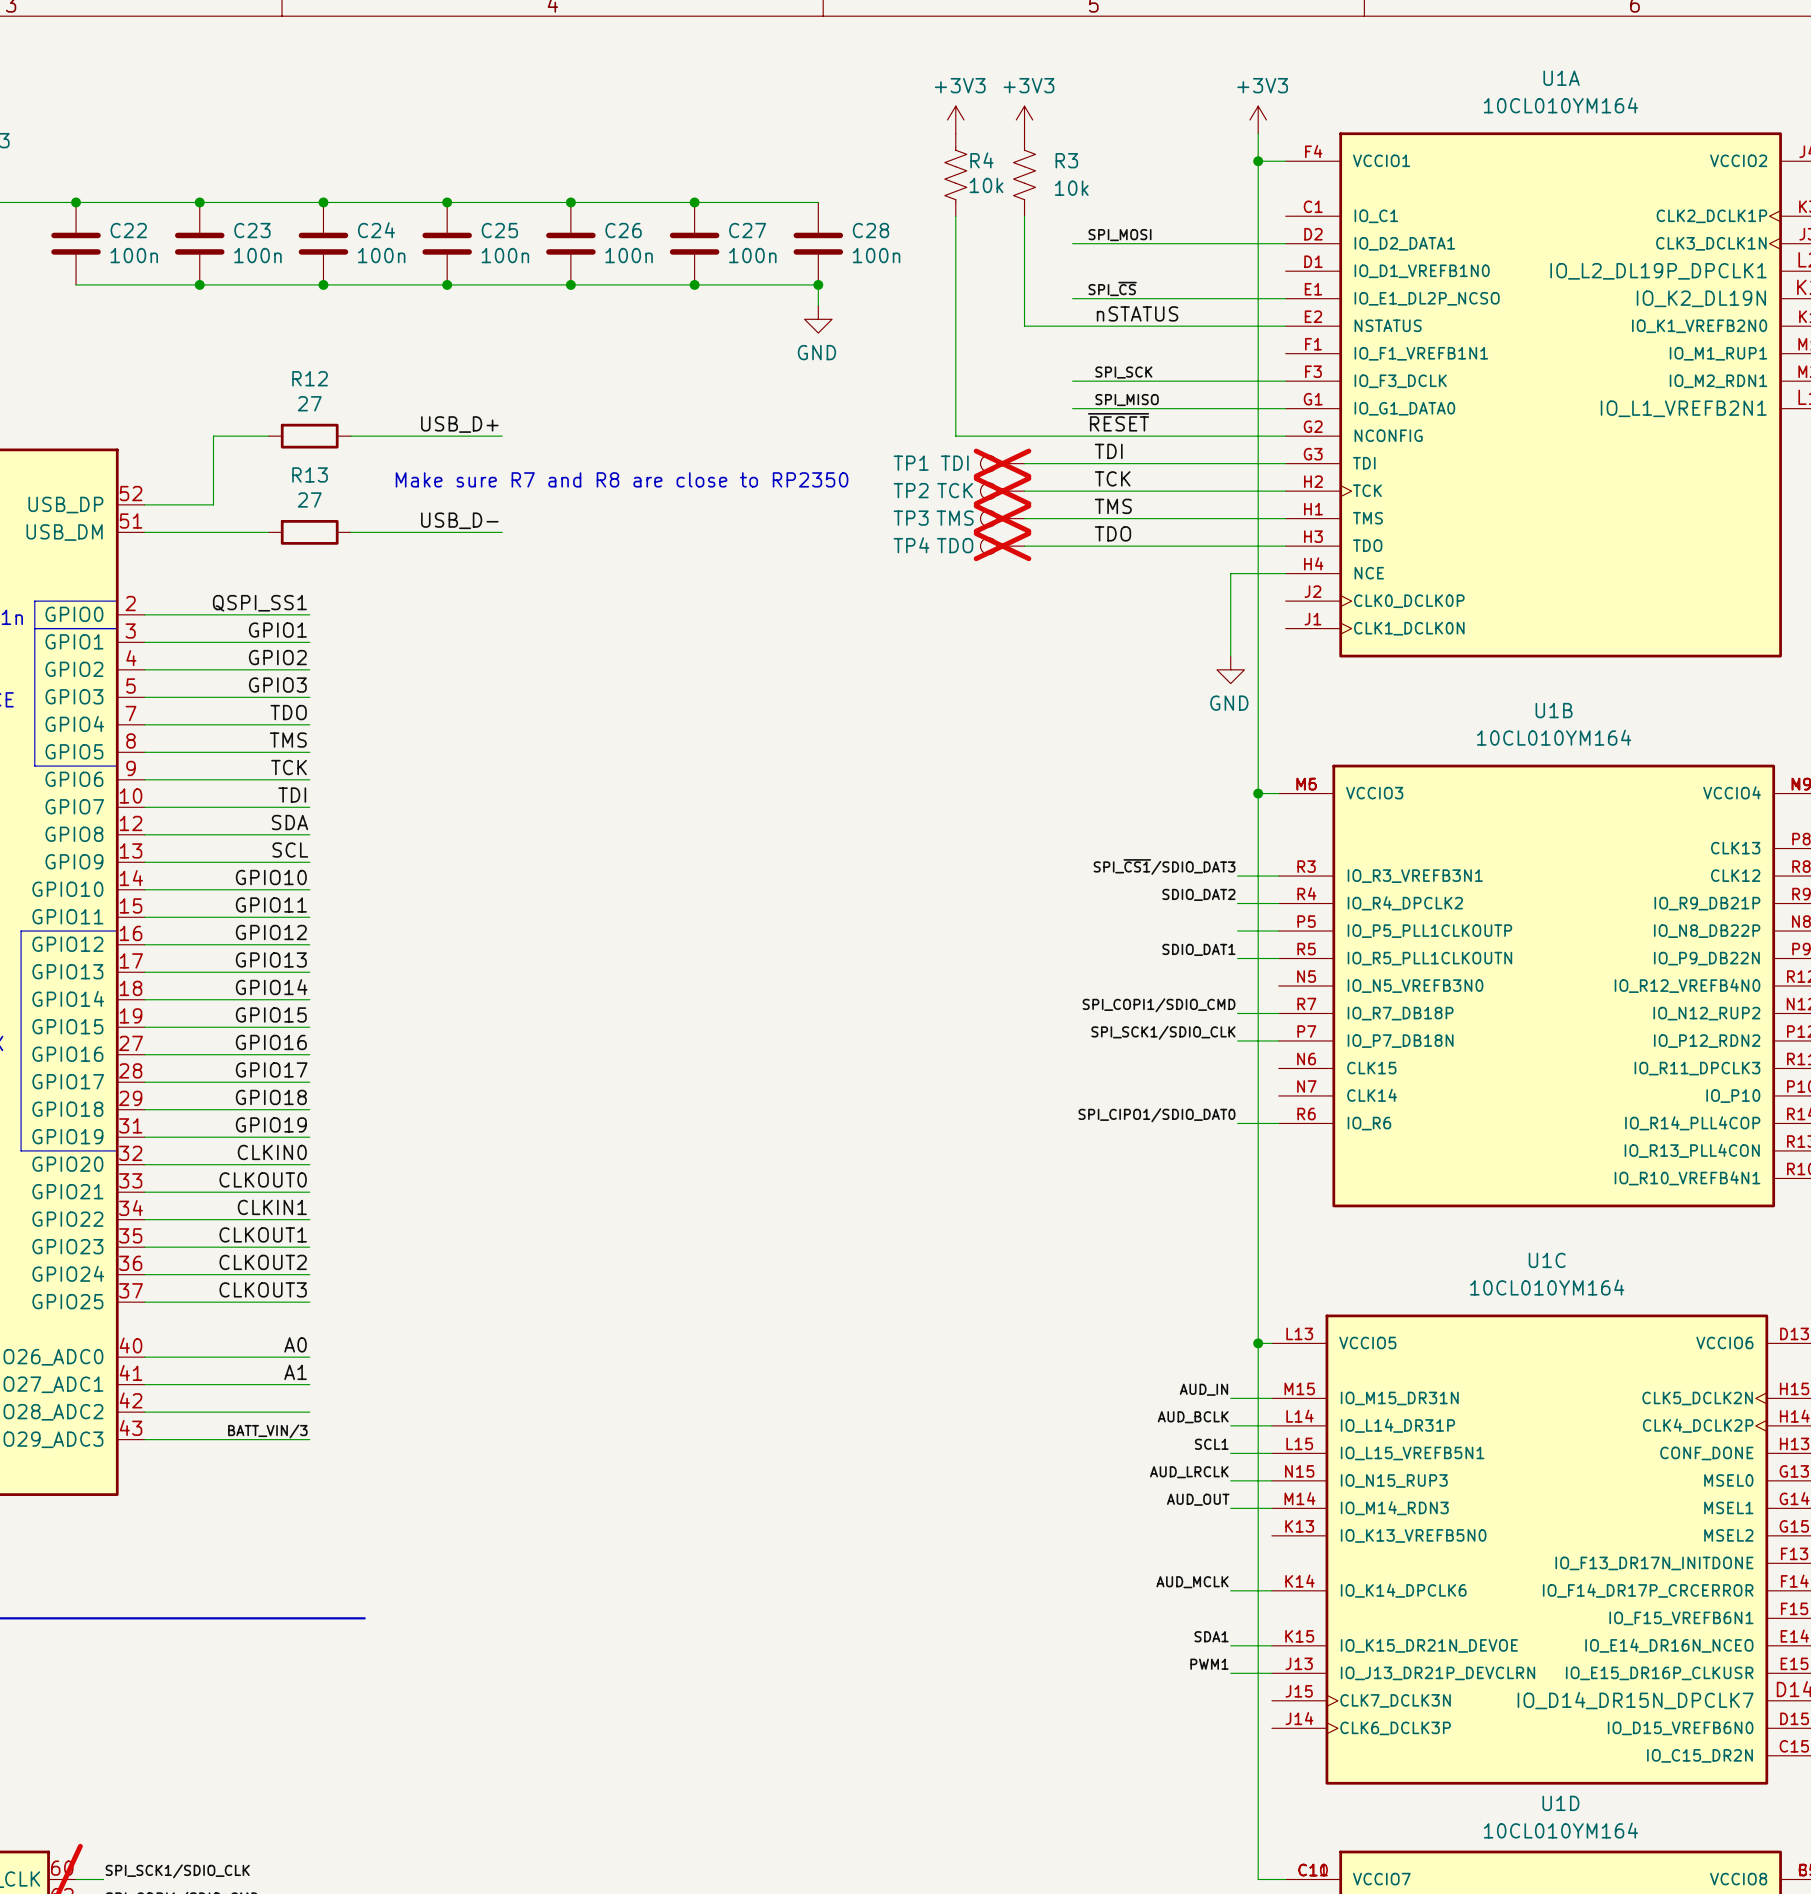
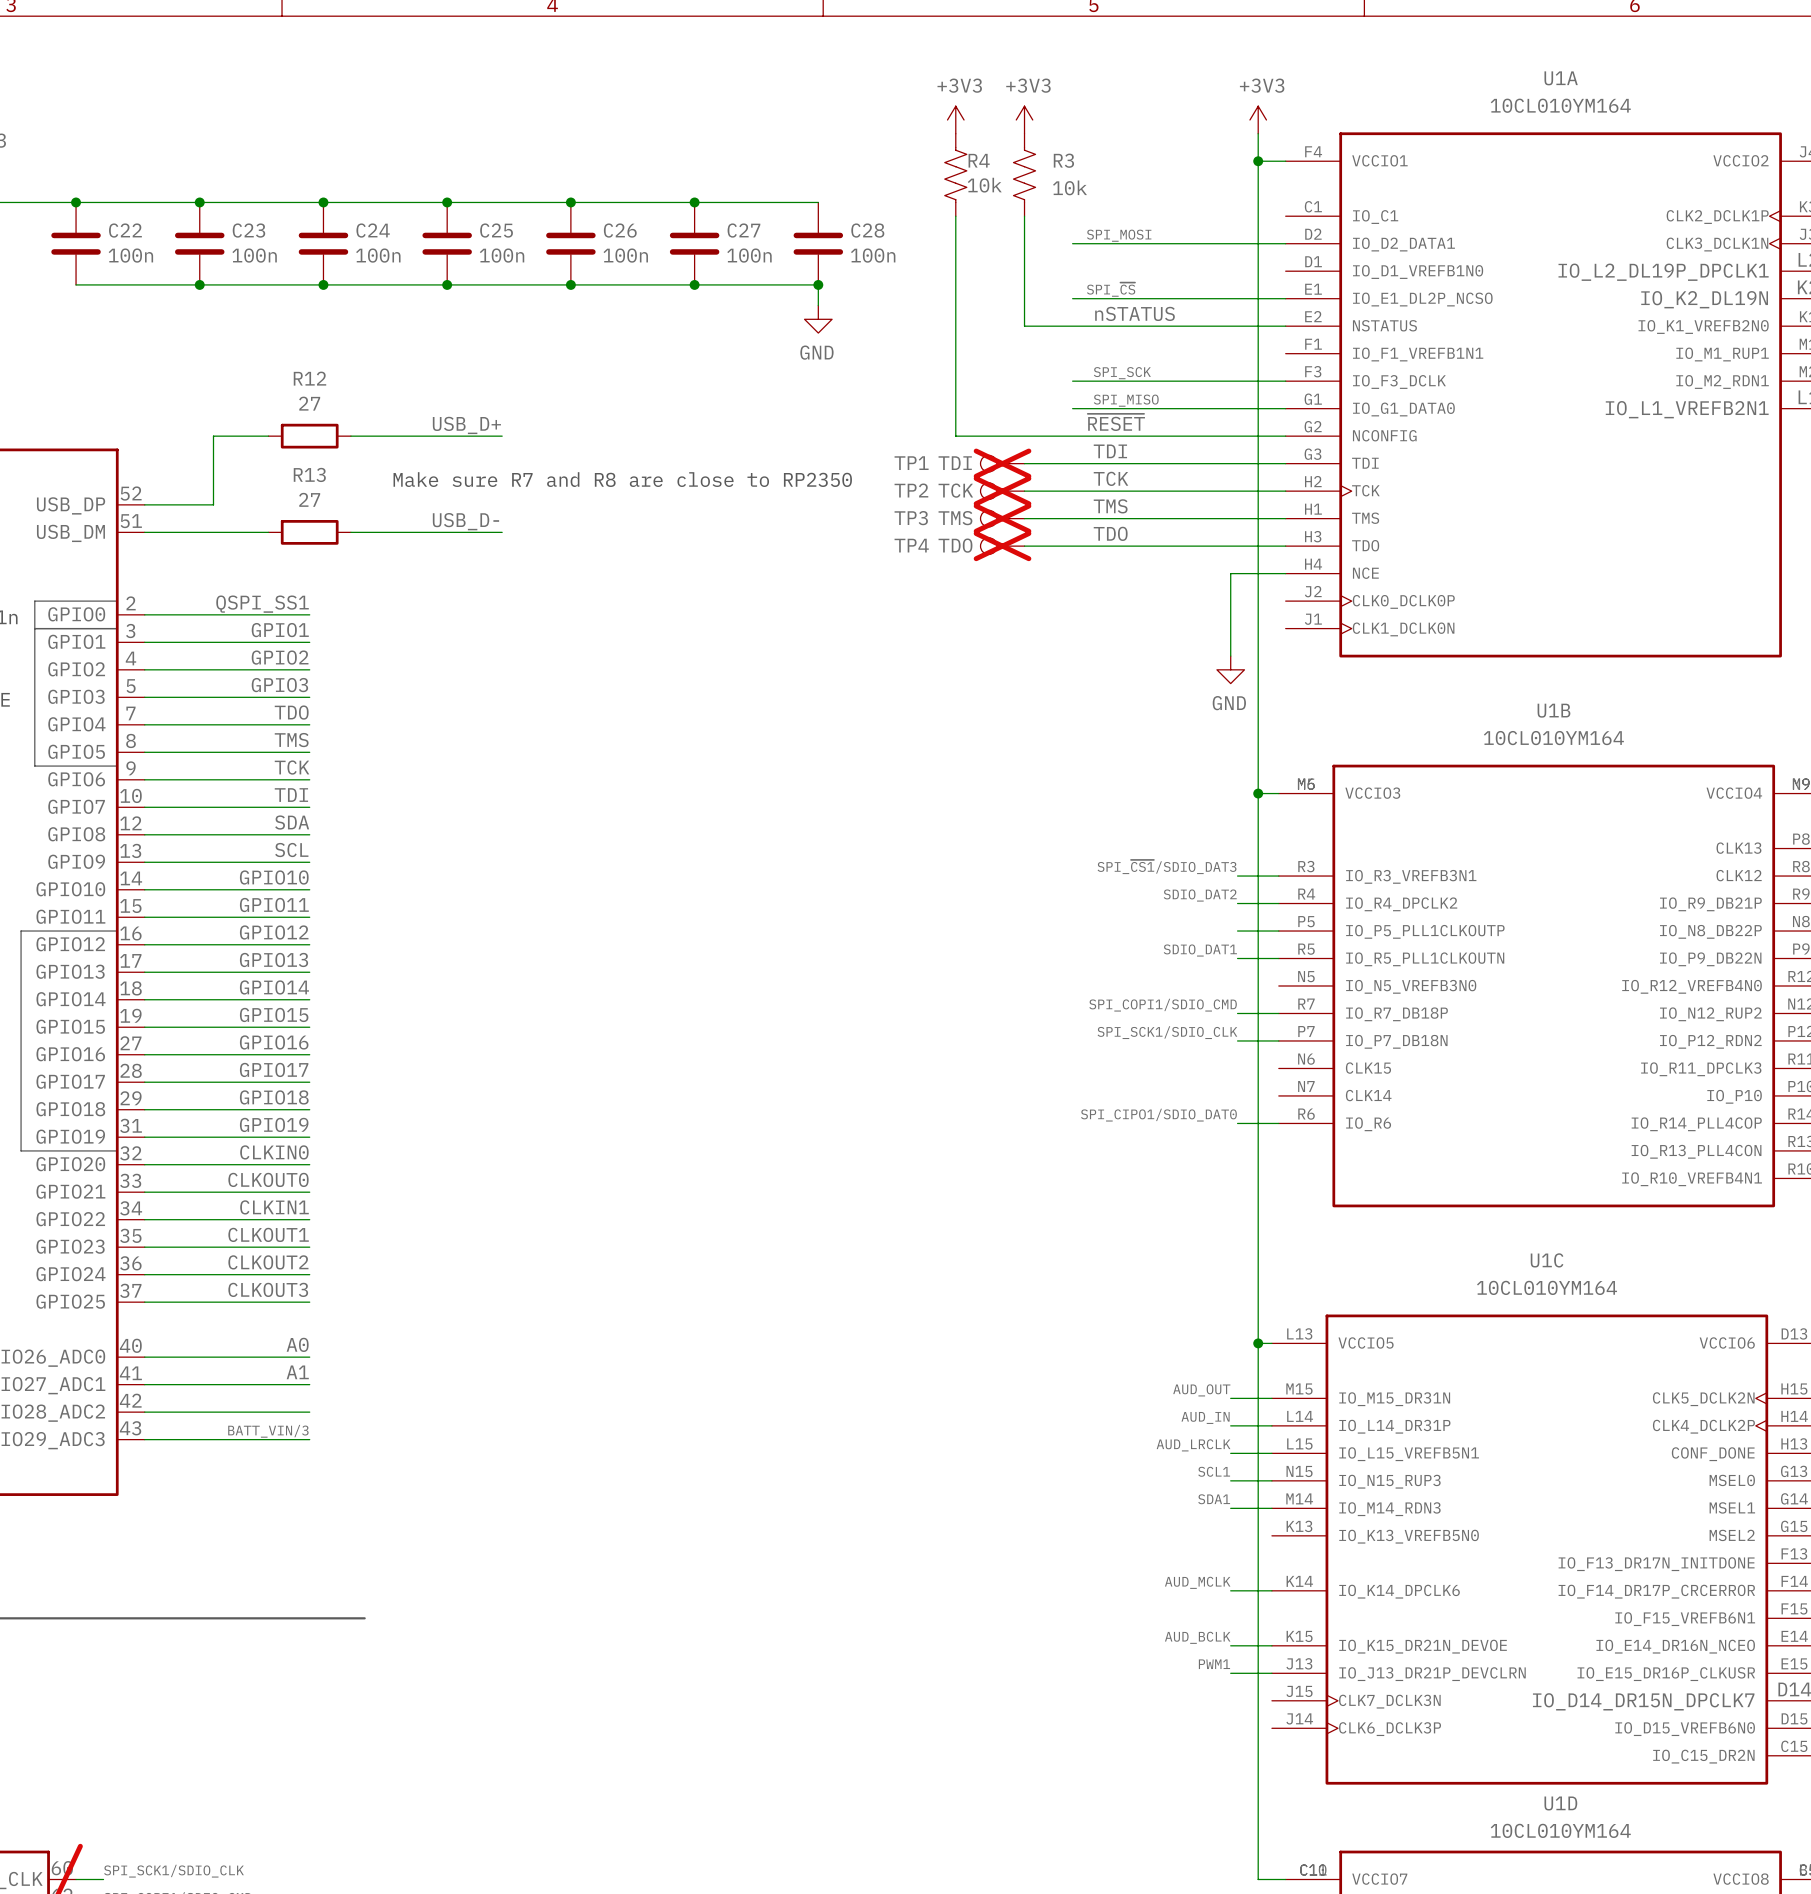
label: AUD_IN (1203, 1389) -> AUD_OUT (1201, 1390)
label: AUD_BCLK (1193, 1417) -> AUD_IN (1205, 1417)
label: SCL1 (1211, 1444) -> AUD_LRCLK (1193, 1445)
label: AUD_LRCLK (1189, 1472) -> SCL1 (1214, 1471)
label: AUD_OUT (1198, 1499) -> SDA1 (1214, 1499)
label: SDA1 (1211, 1636) -> AUD_BCLK (1197, 1637)

